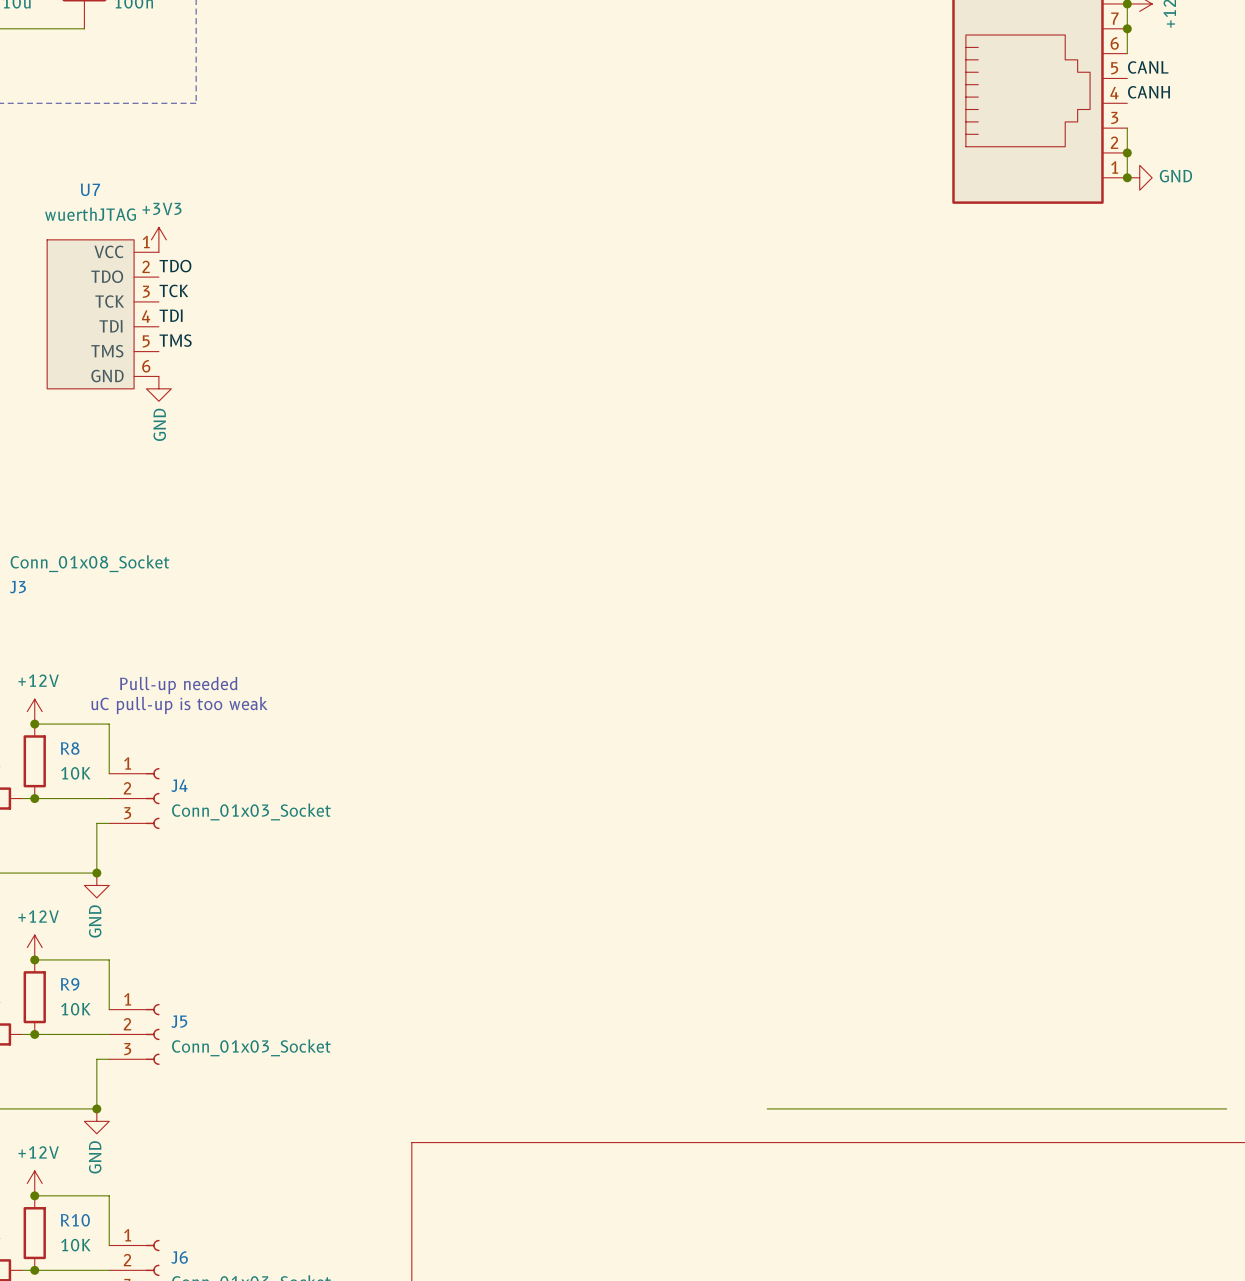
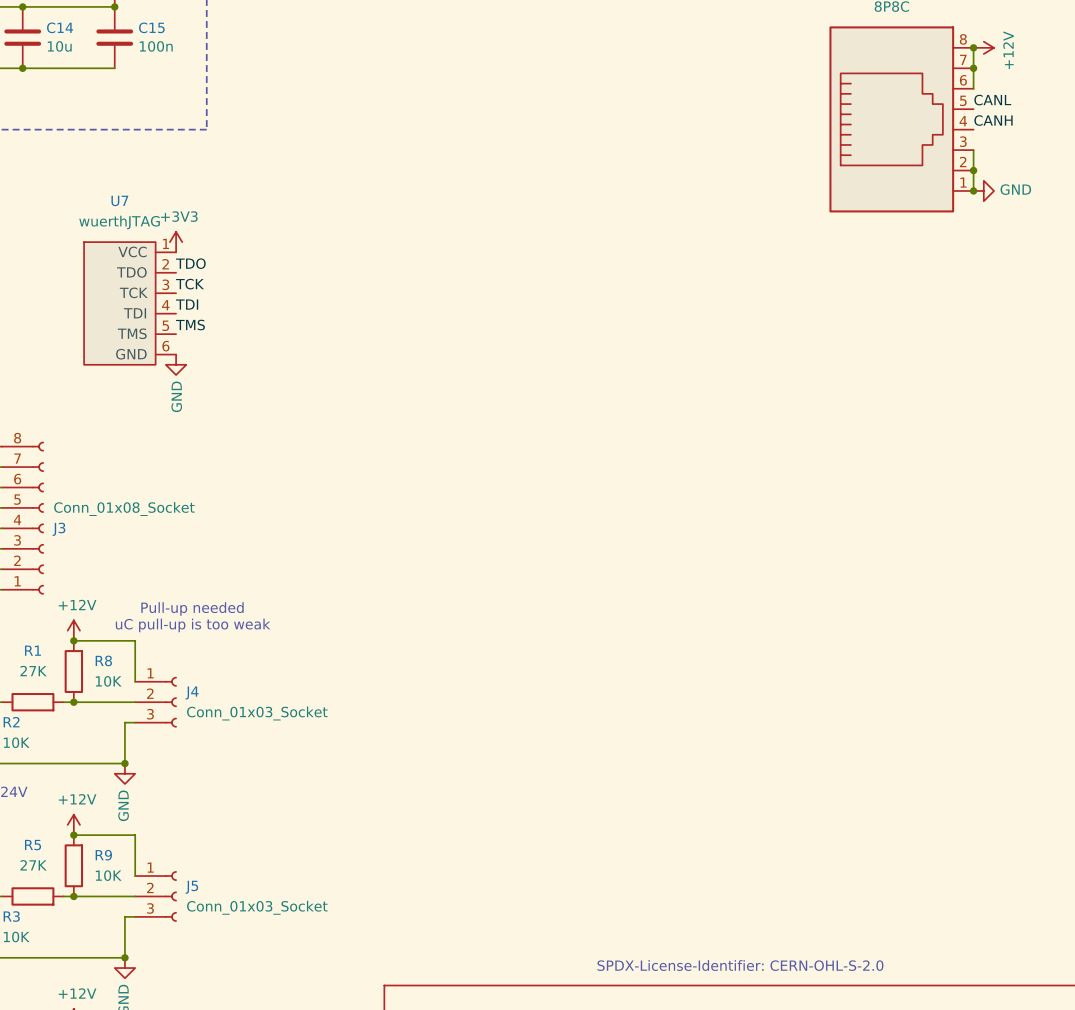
wire: (767, 1108) (1226, 1108) -> none
text: none -> SPDX-License-Identifier: CERN-OHL-S-2.0 (740, 965)

